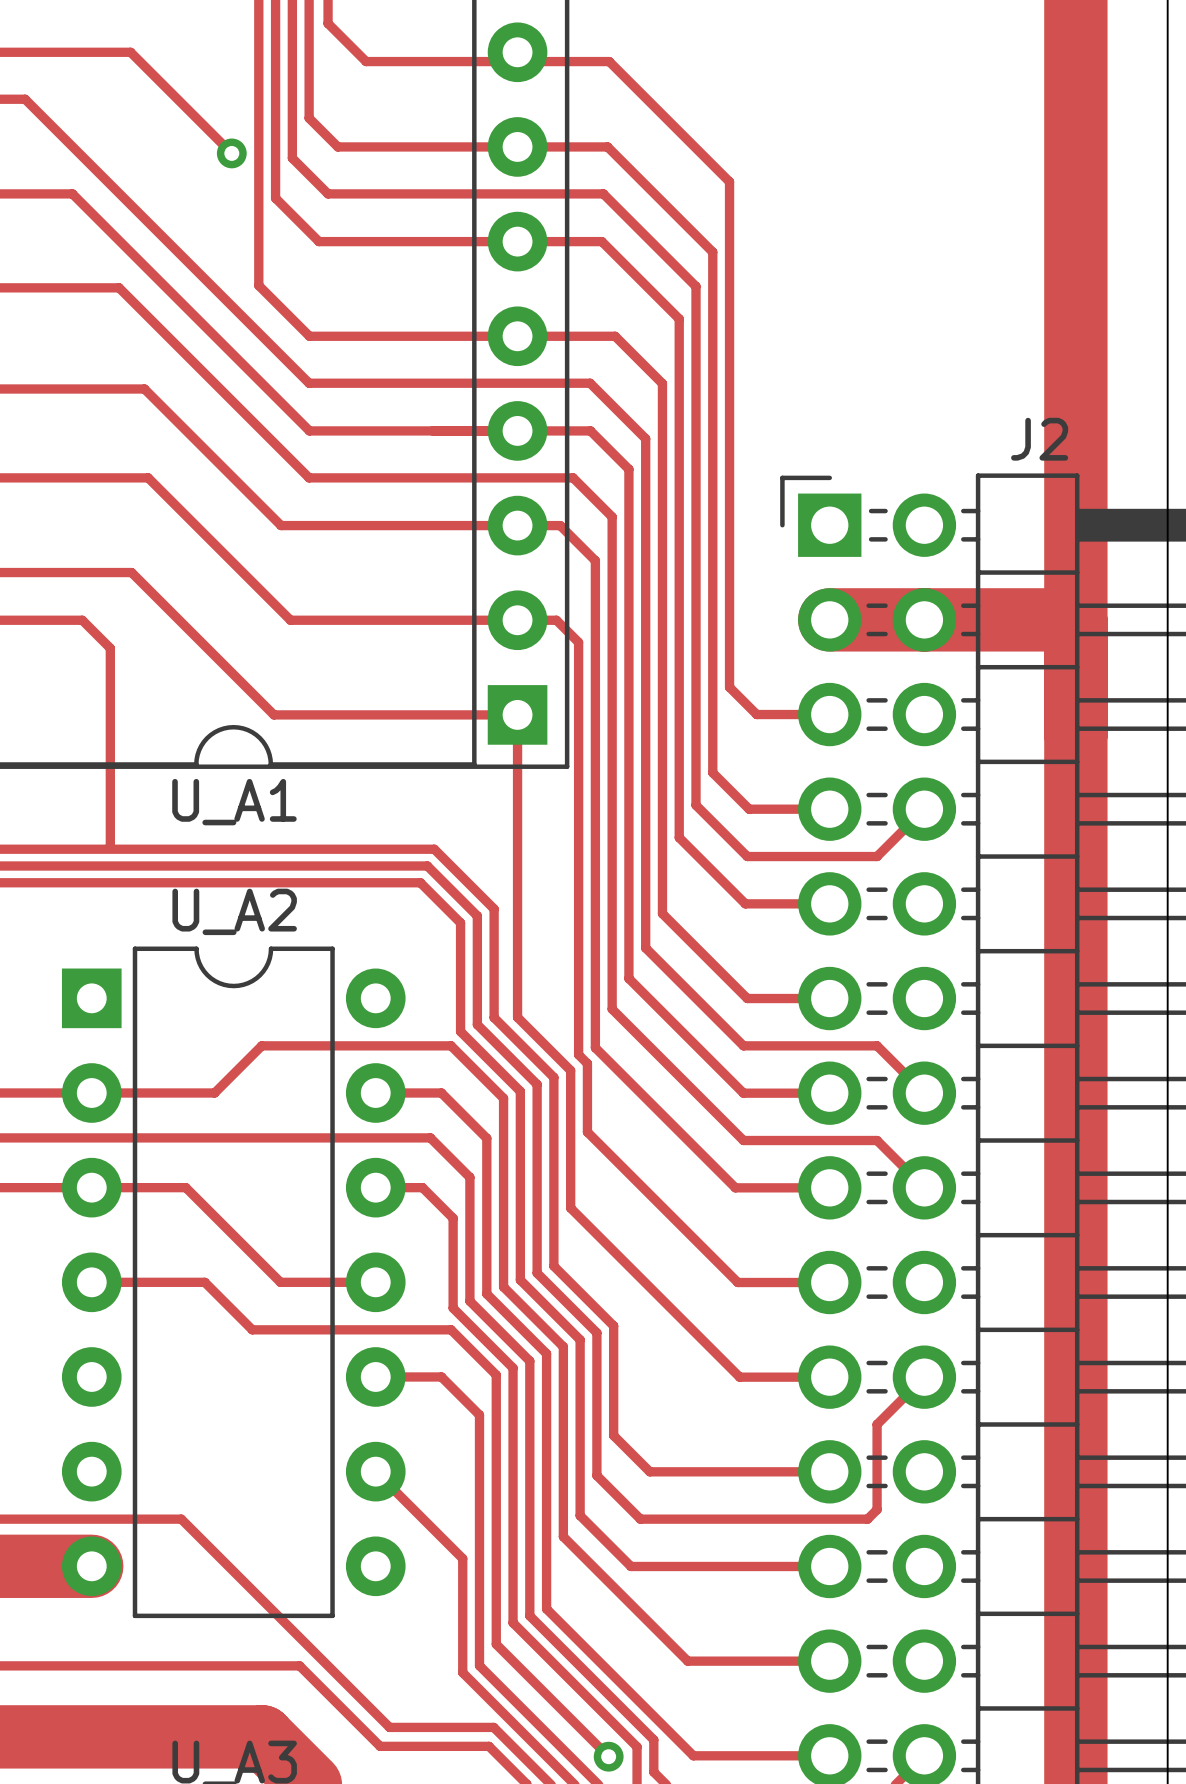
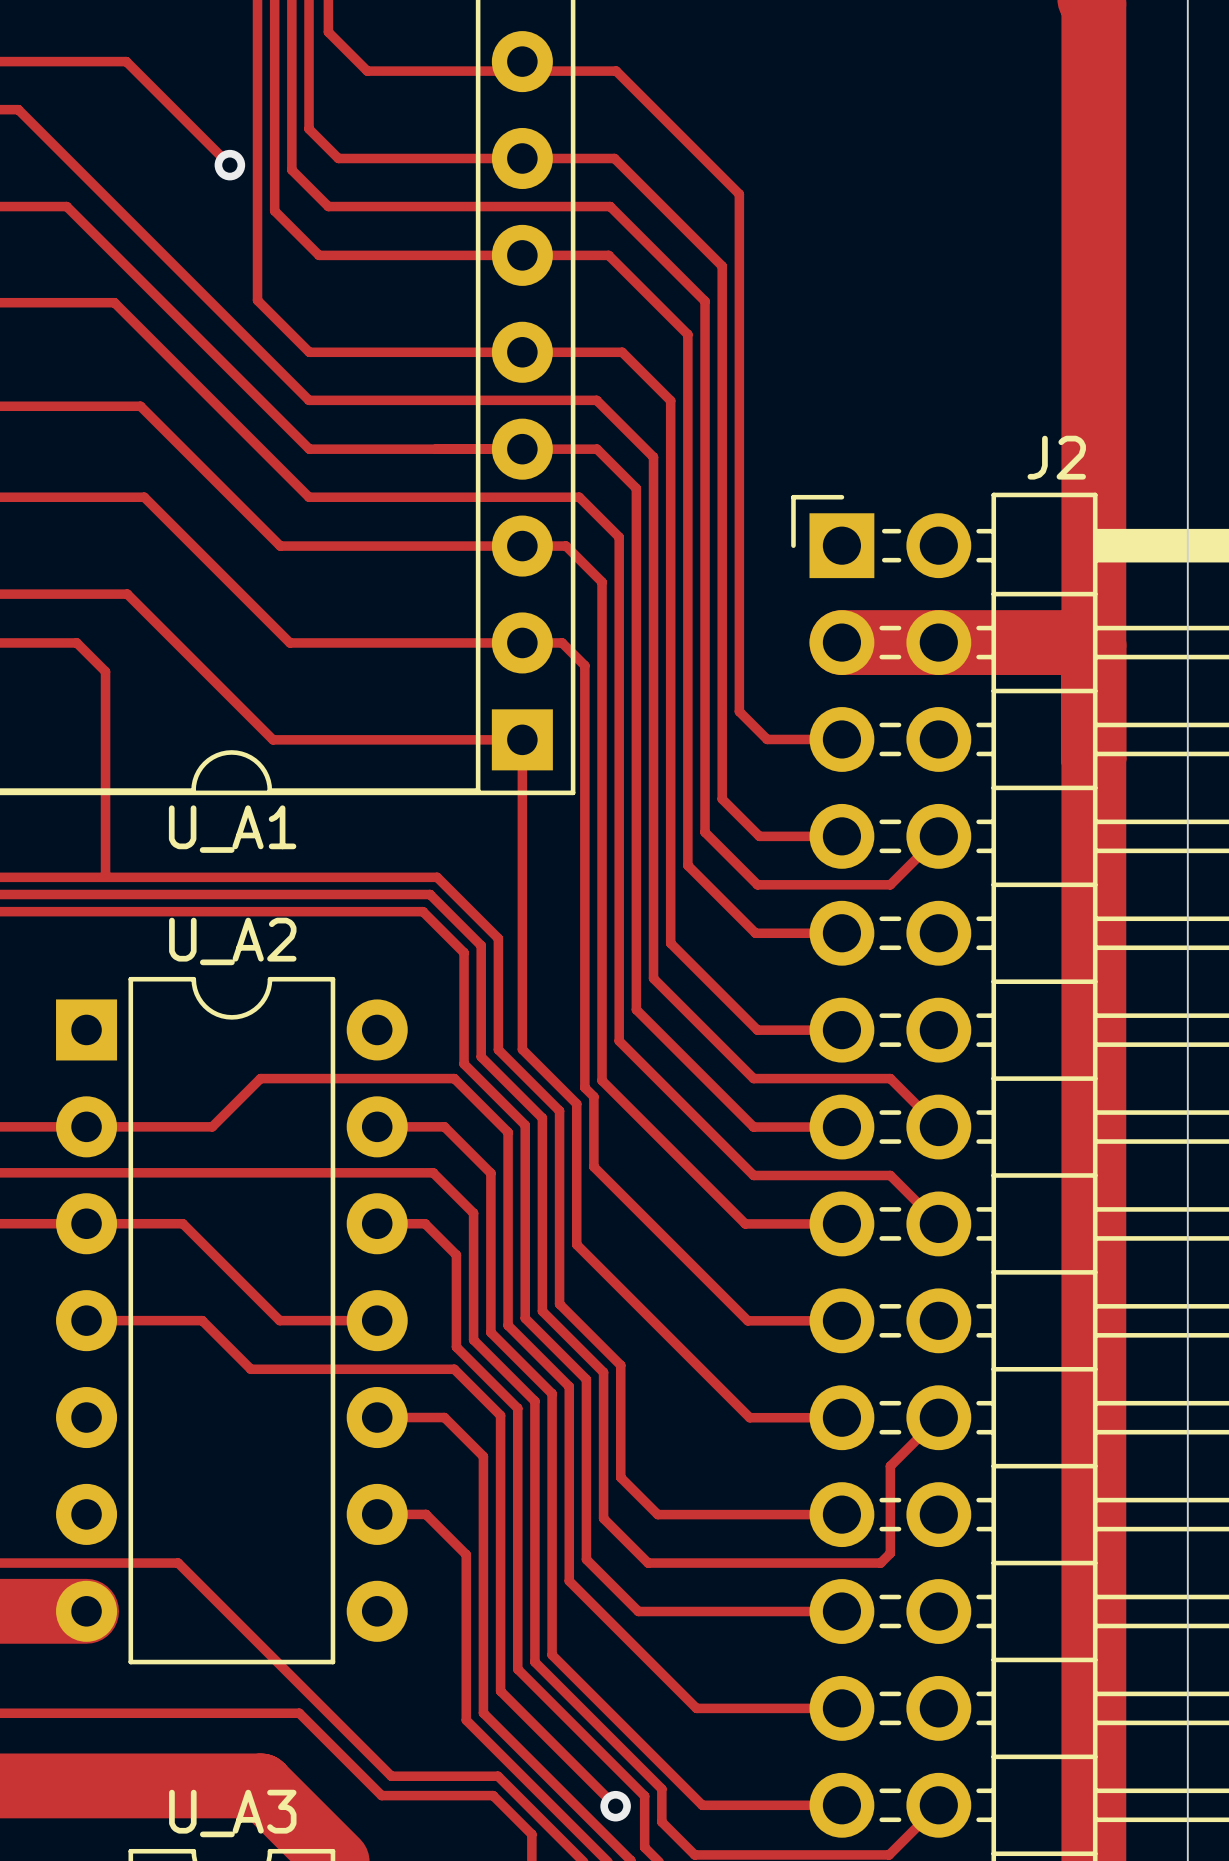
track: (375, 1471) (462, 1558) -> (377, 1514) (425, 1514) (466, 1554) (466, 1603)

